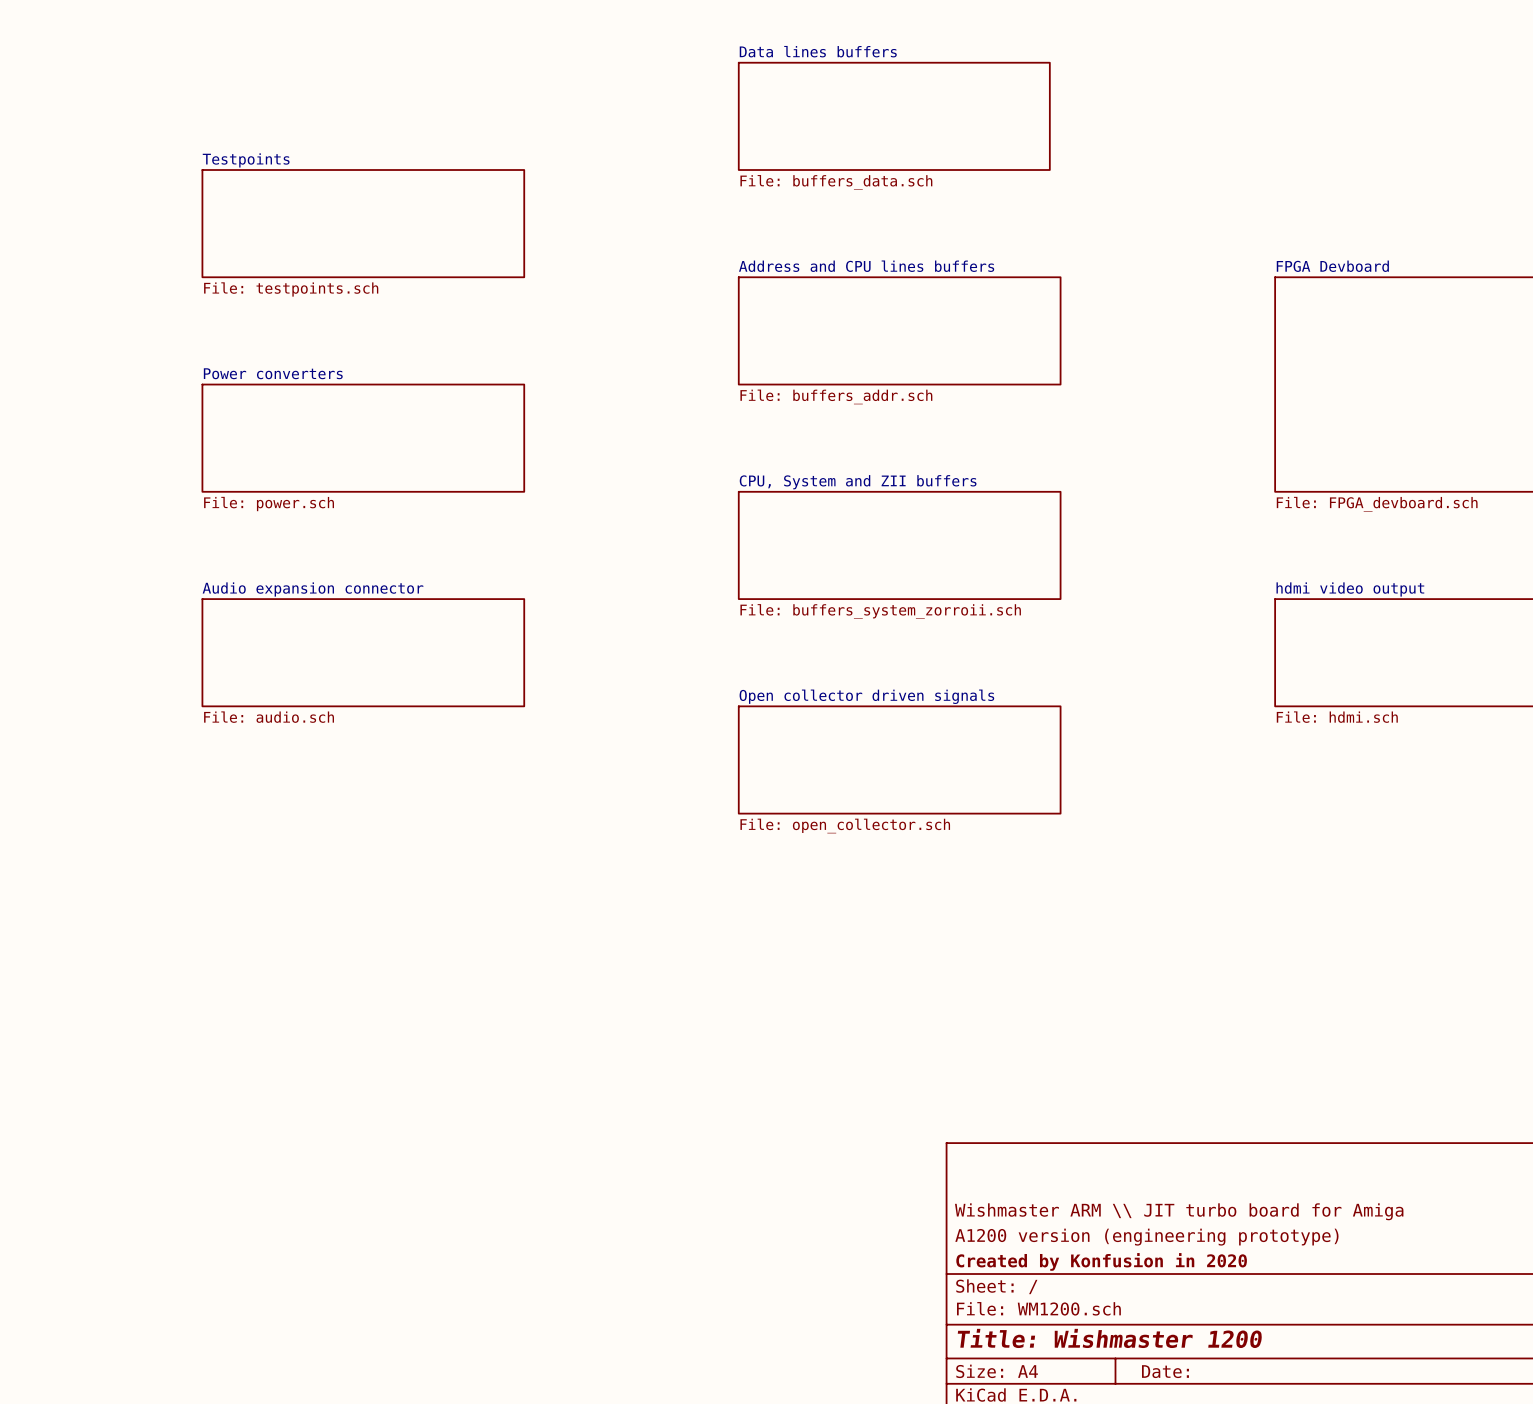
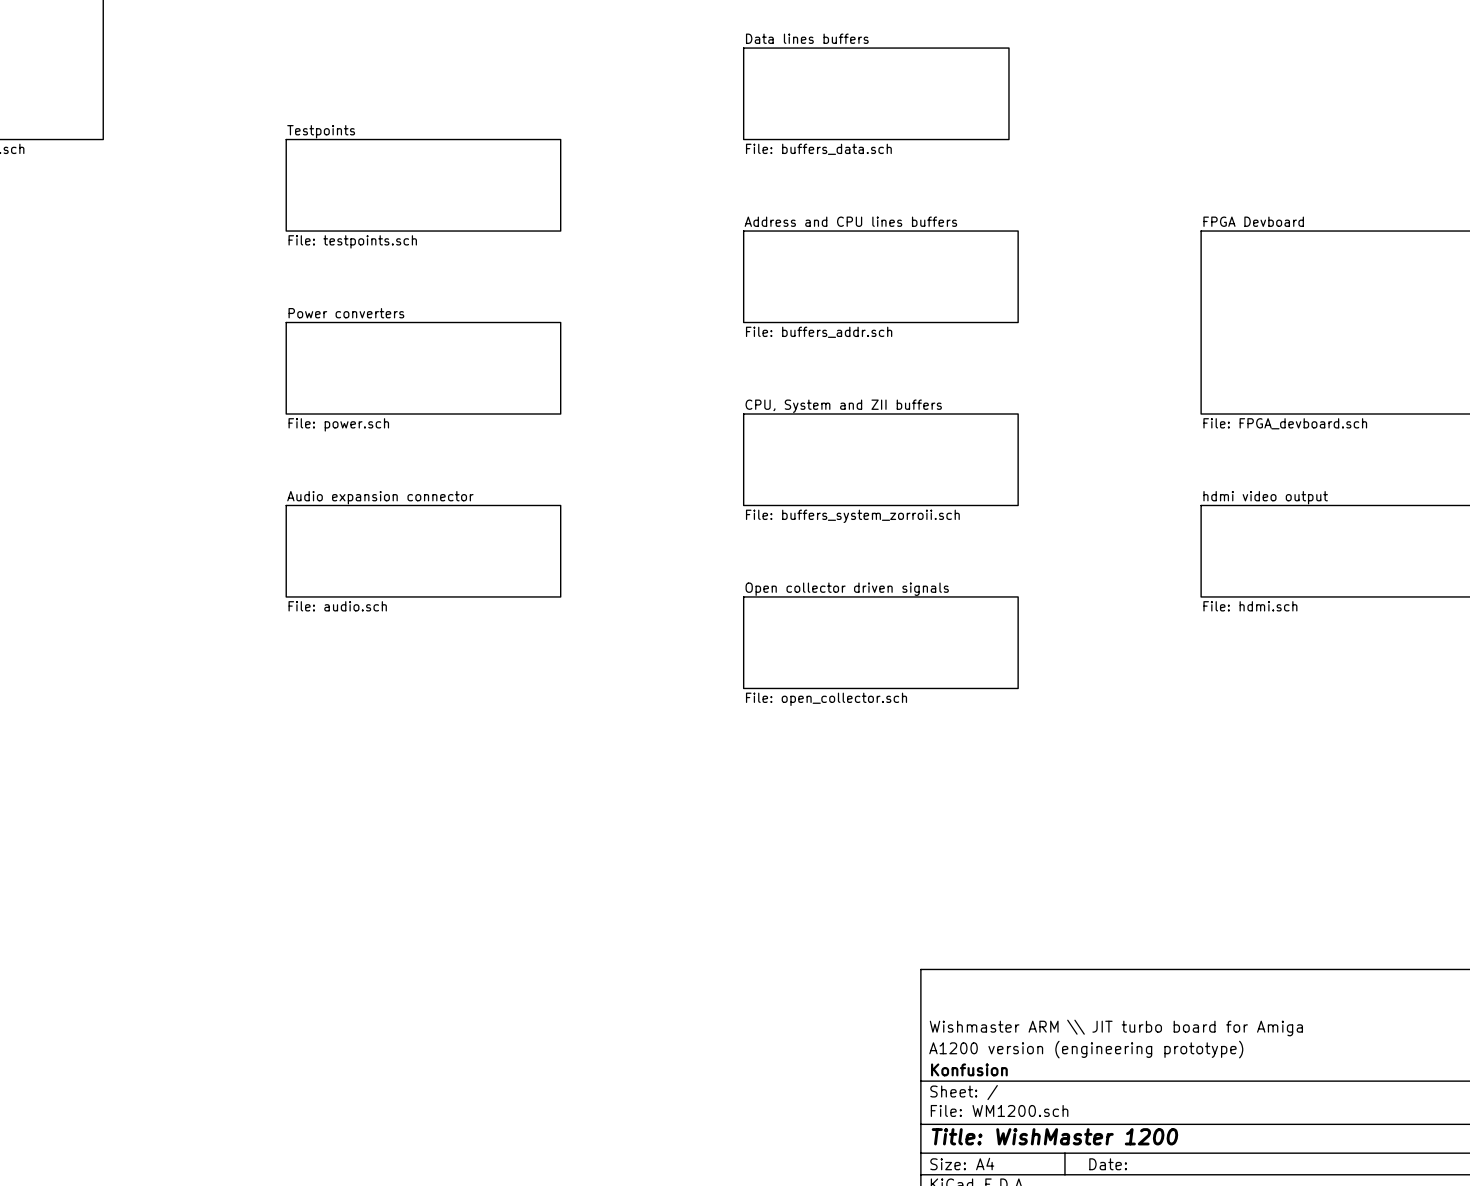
title block: Created by Konfusion in 2020 (1101, 1261) -> Konfusion (969, 1069)
title block: Title: Wishmaster 1200 (1109, 1338) -> Title: WishMaster 1200 (1054, 1136)

